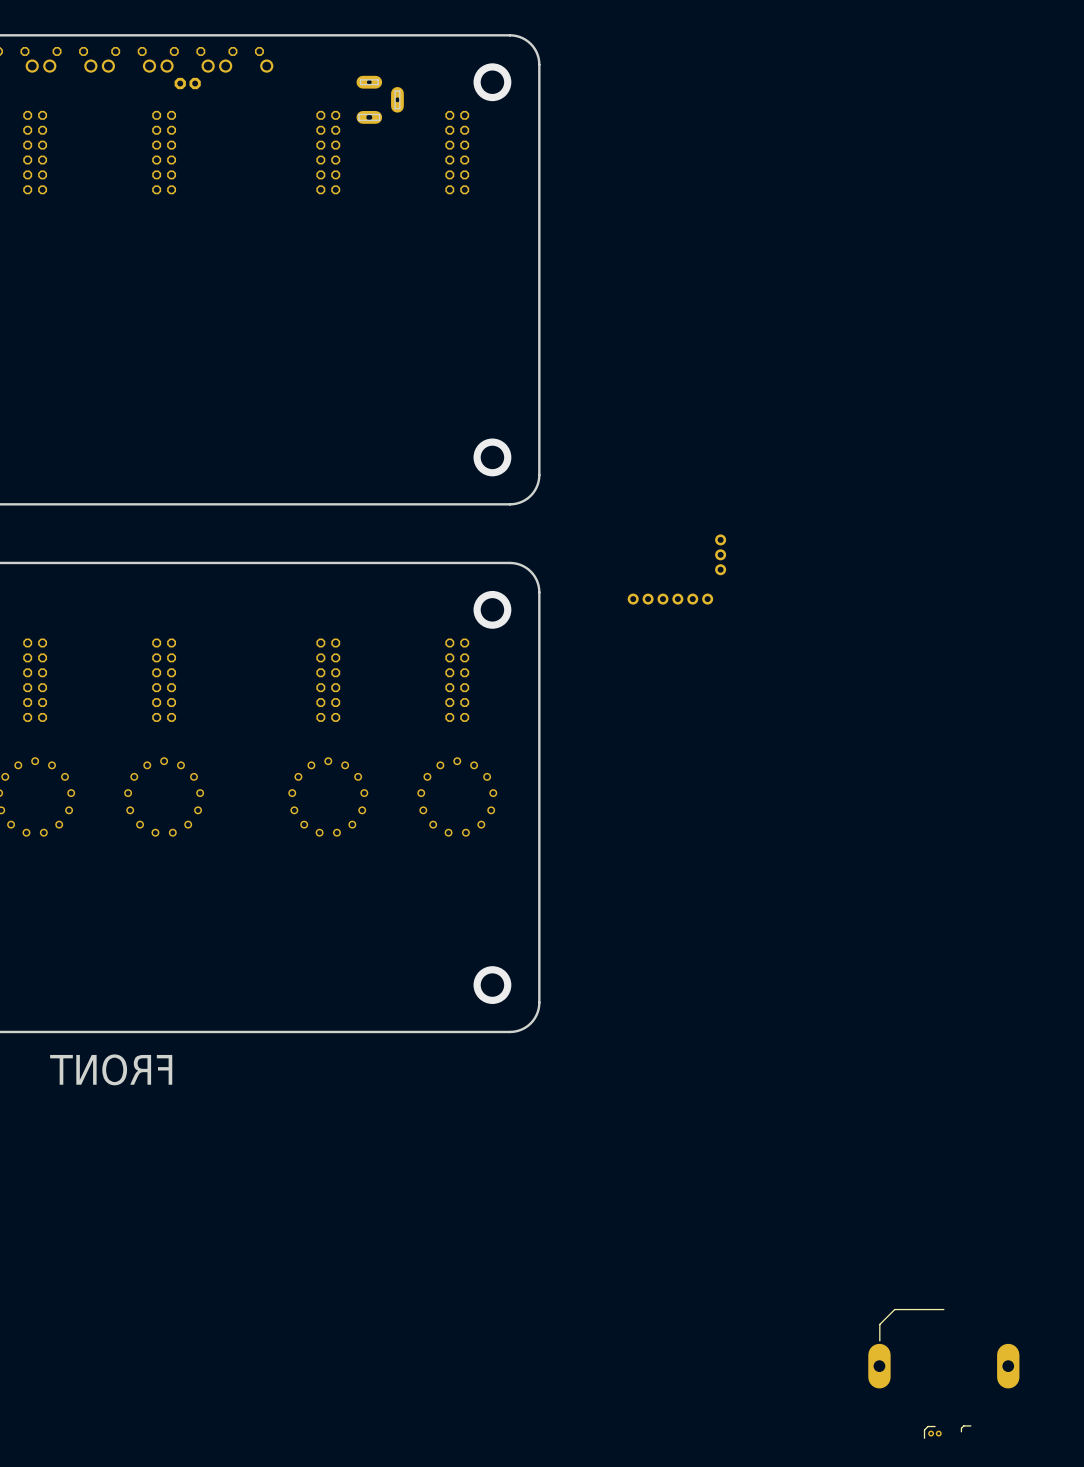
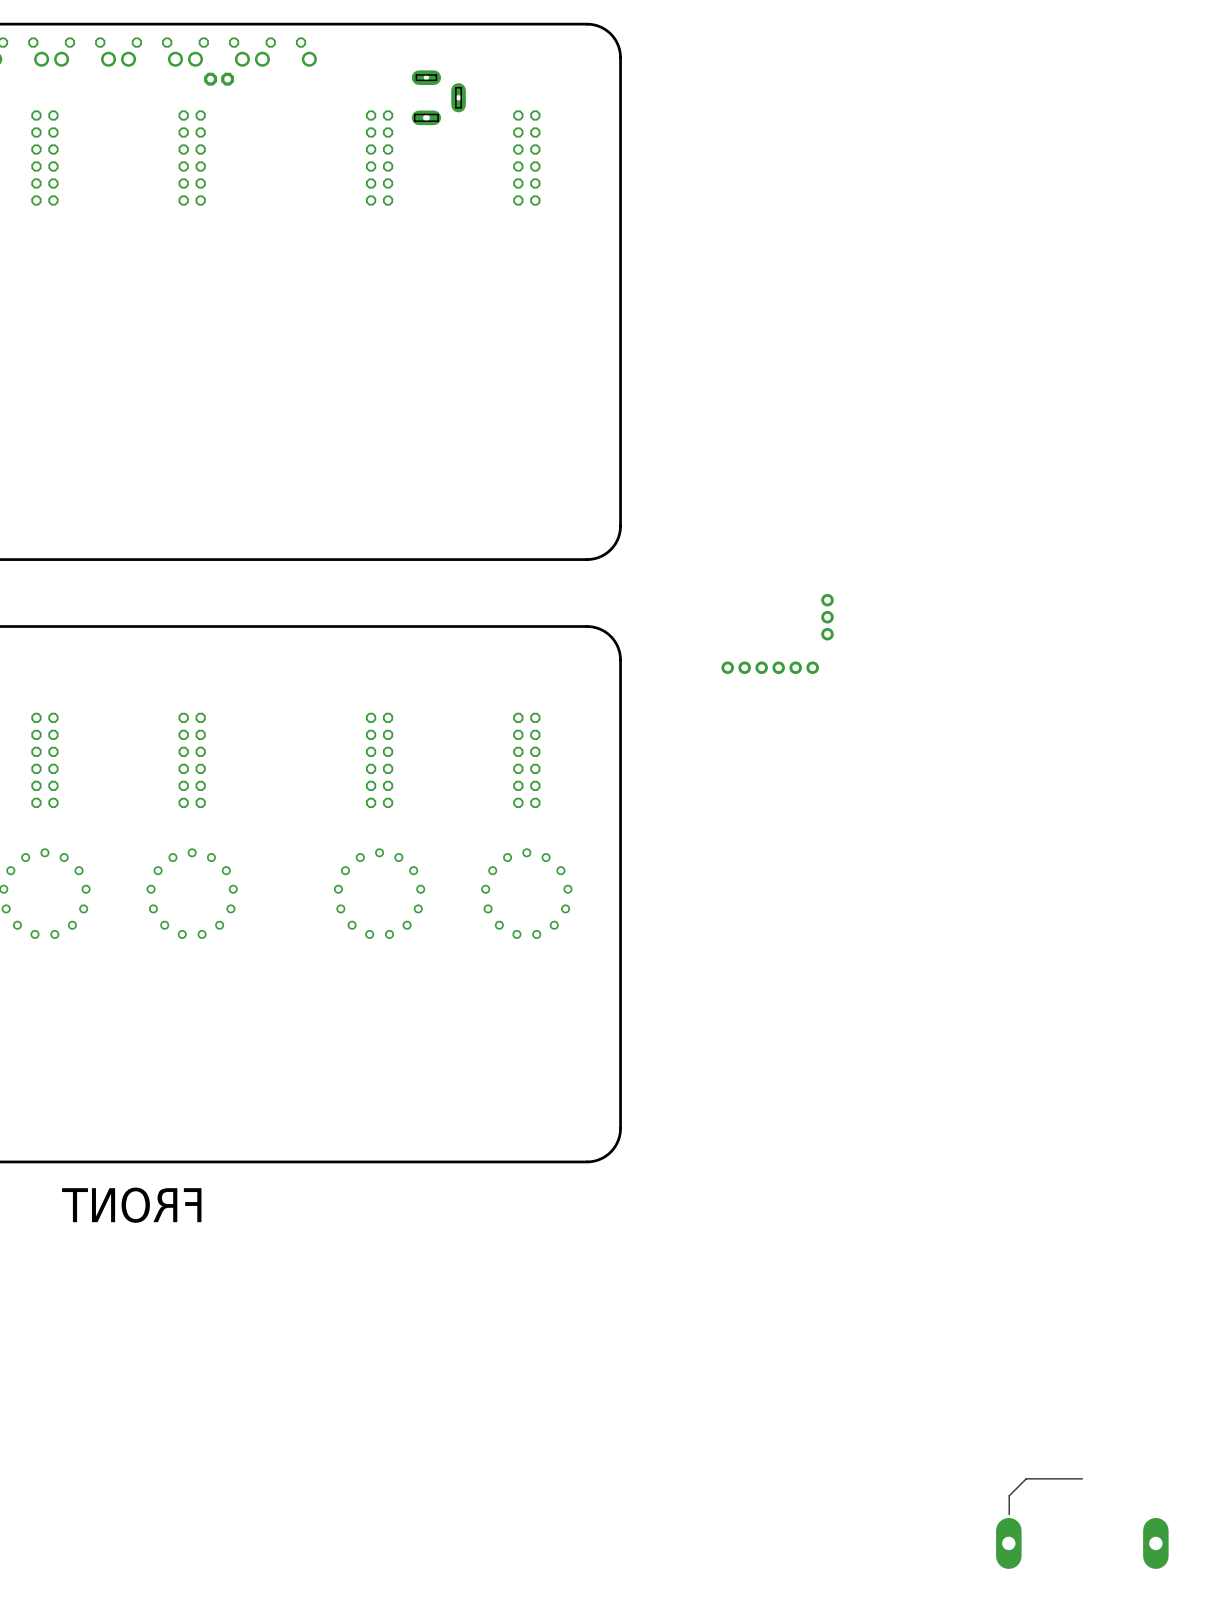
via: (492, 82) -> none
via: (492, 457) -> none
via: (492, 609) -> none
via: (492, 985) -> none

